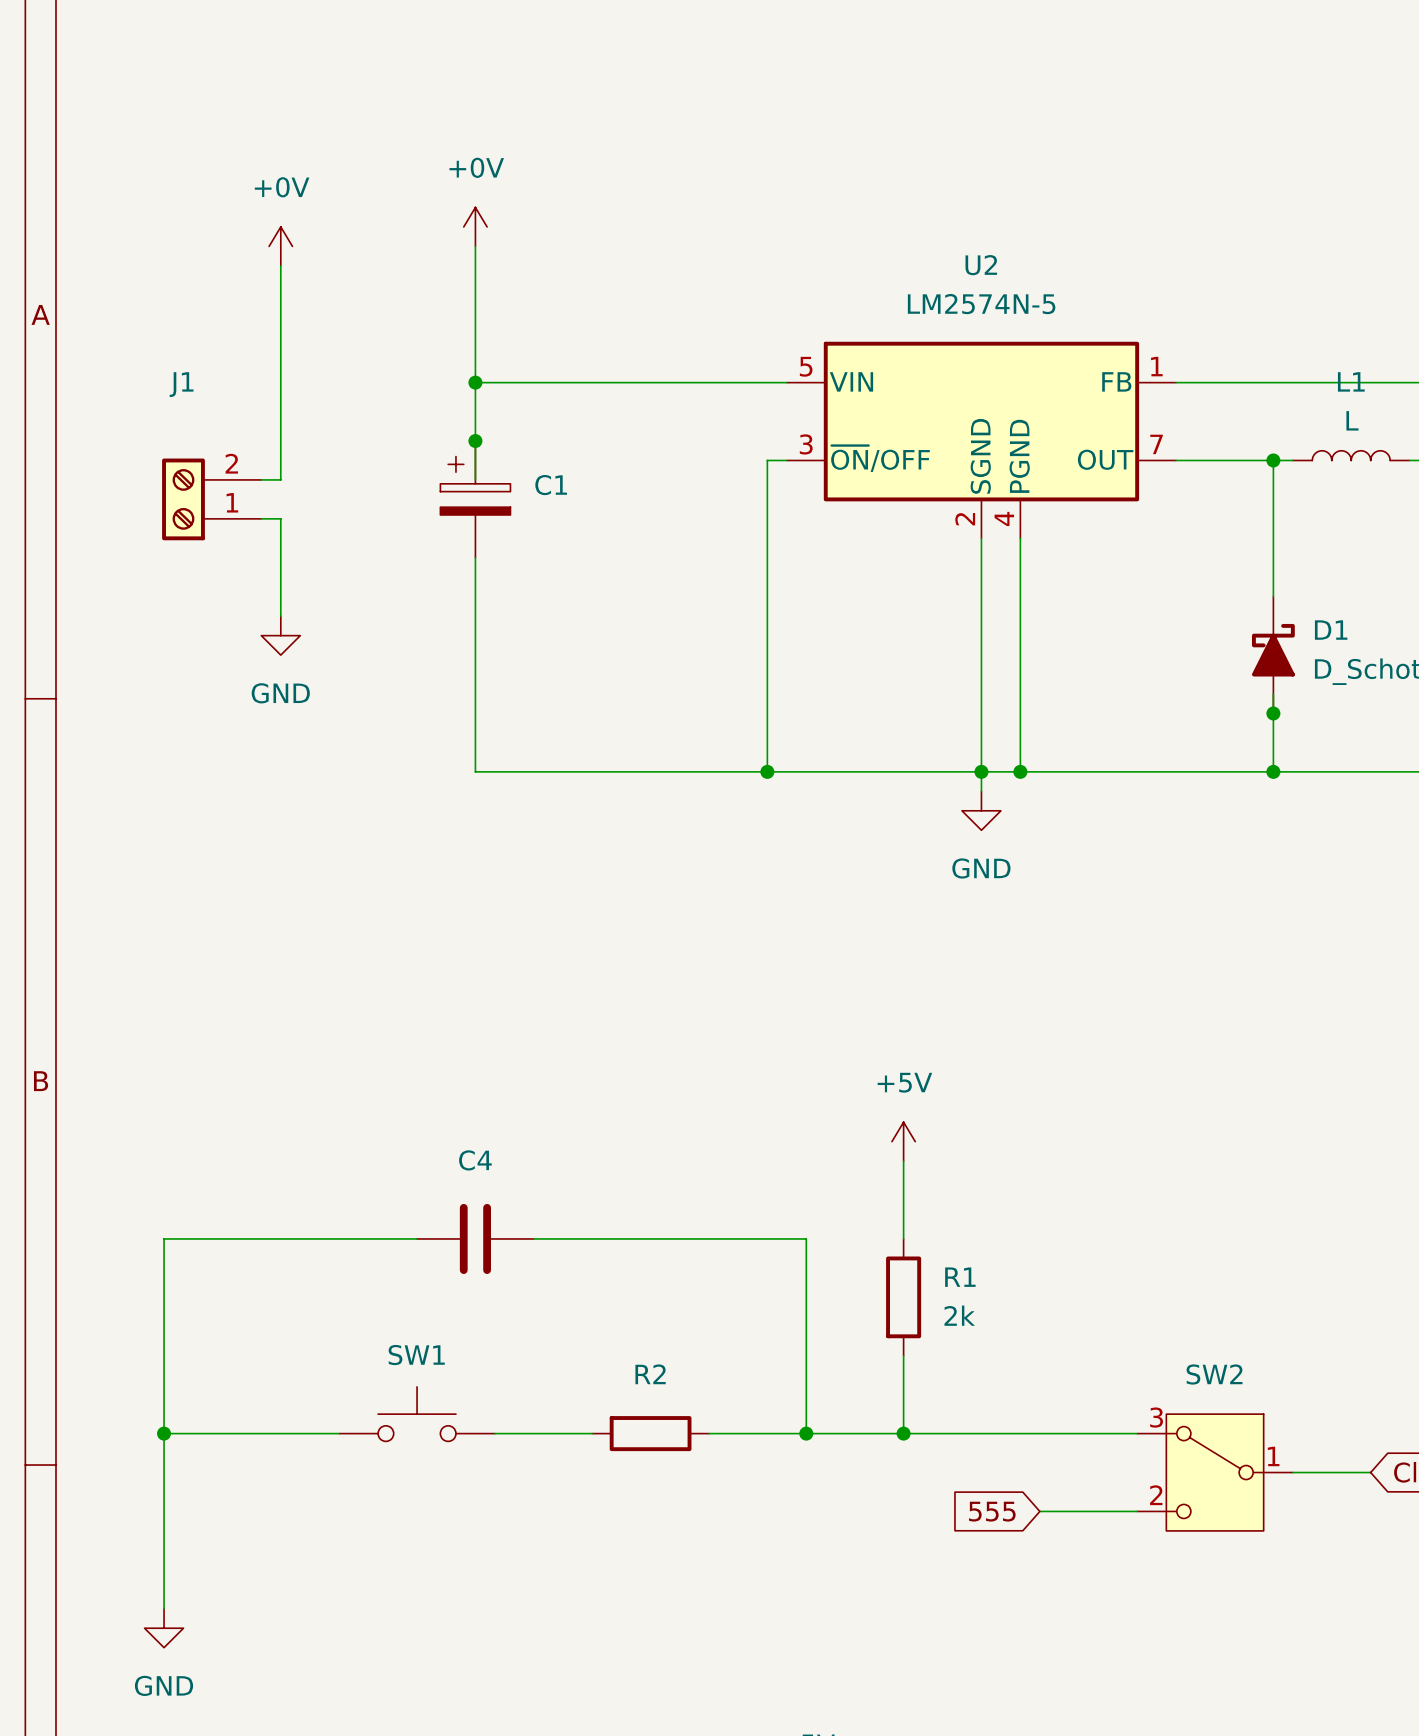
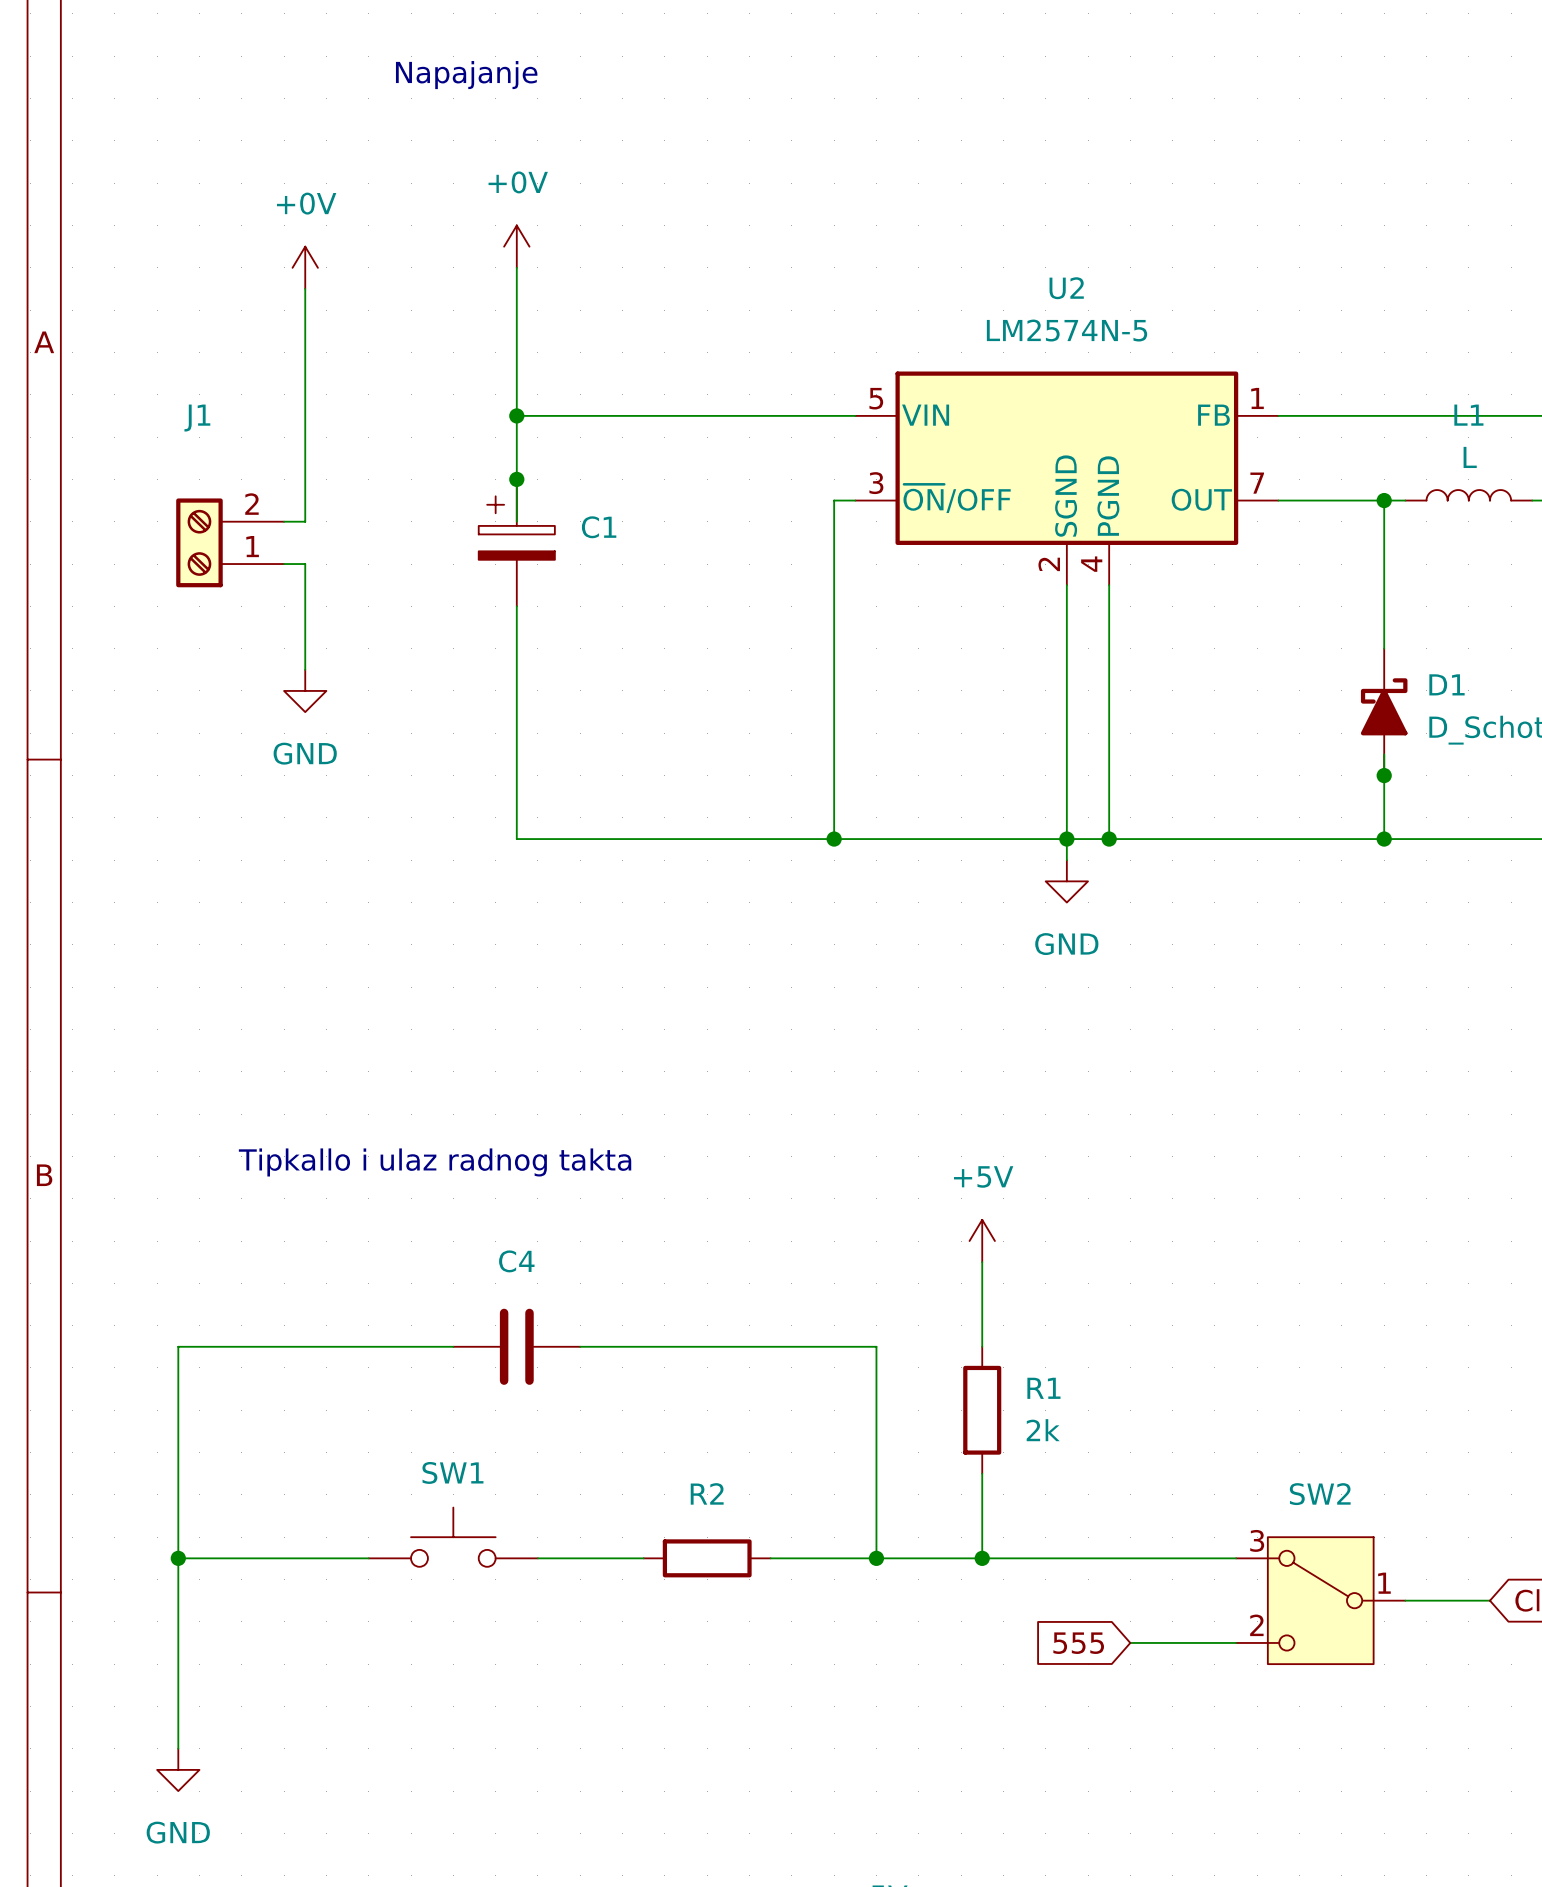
text: none -> Napajanje (466, 75)
text: none -> Tipkallo i ulaz radnog takta (435, 1162)

